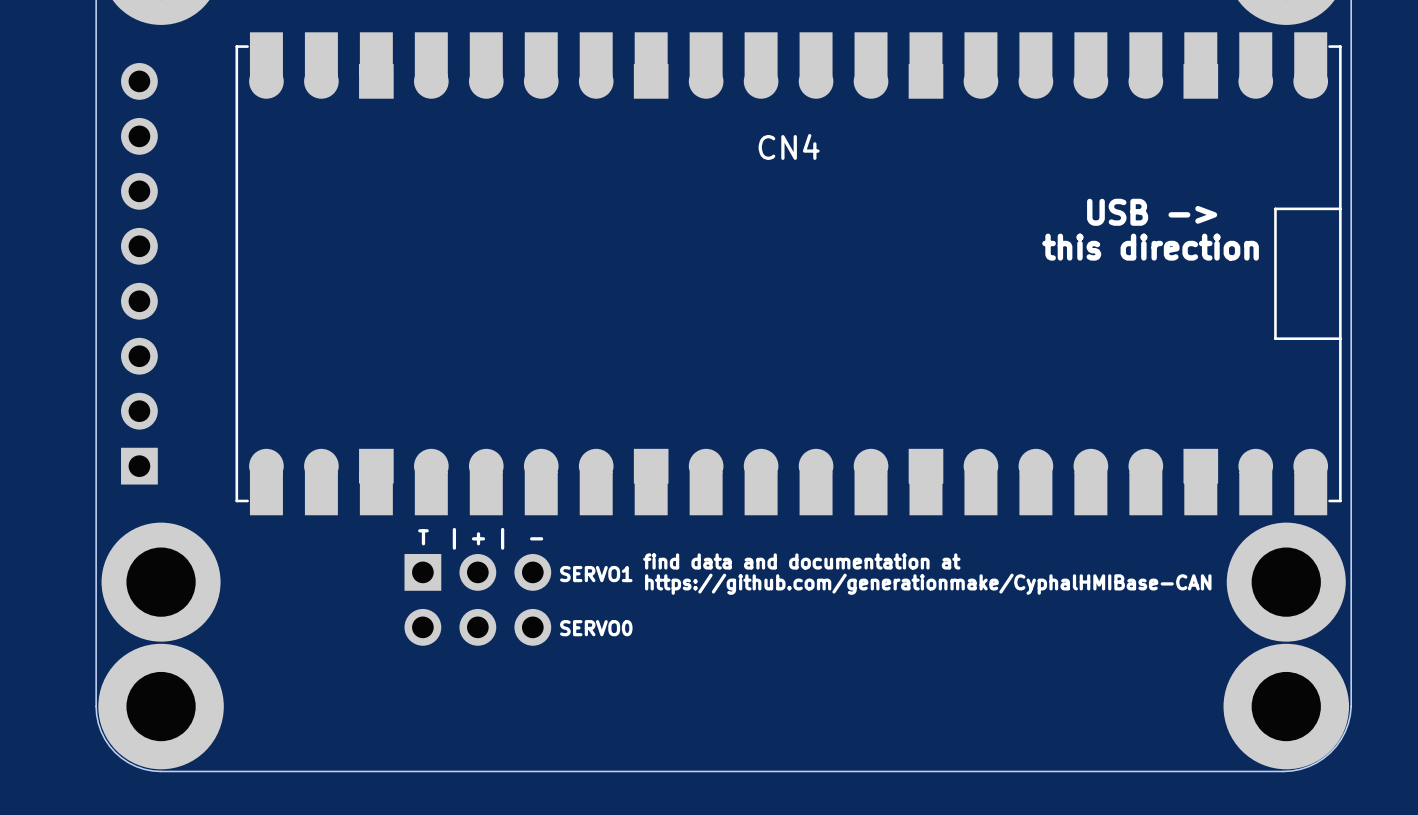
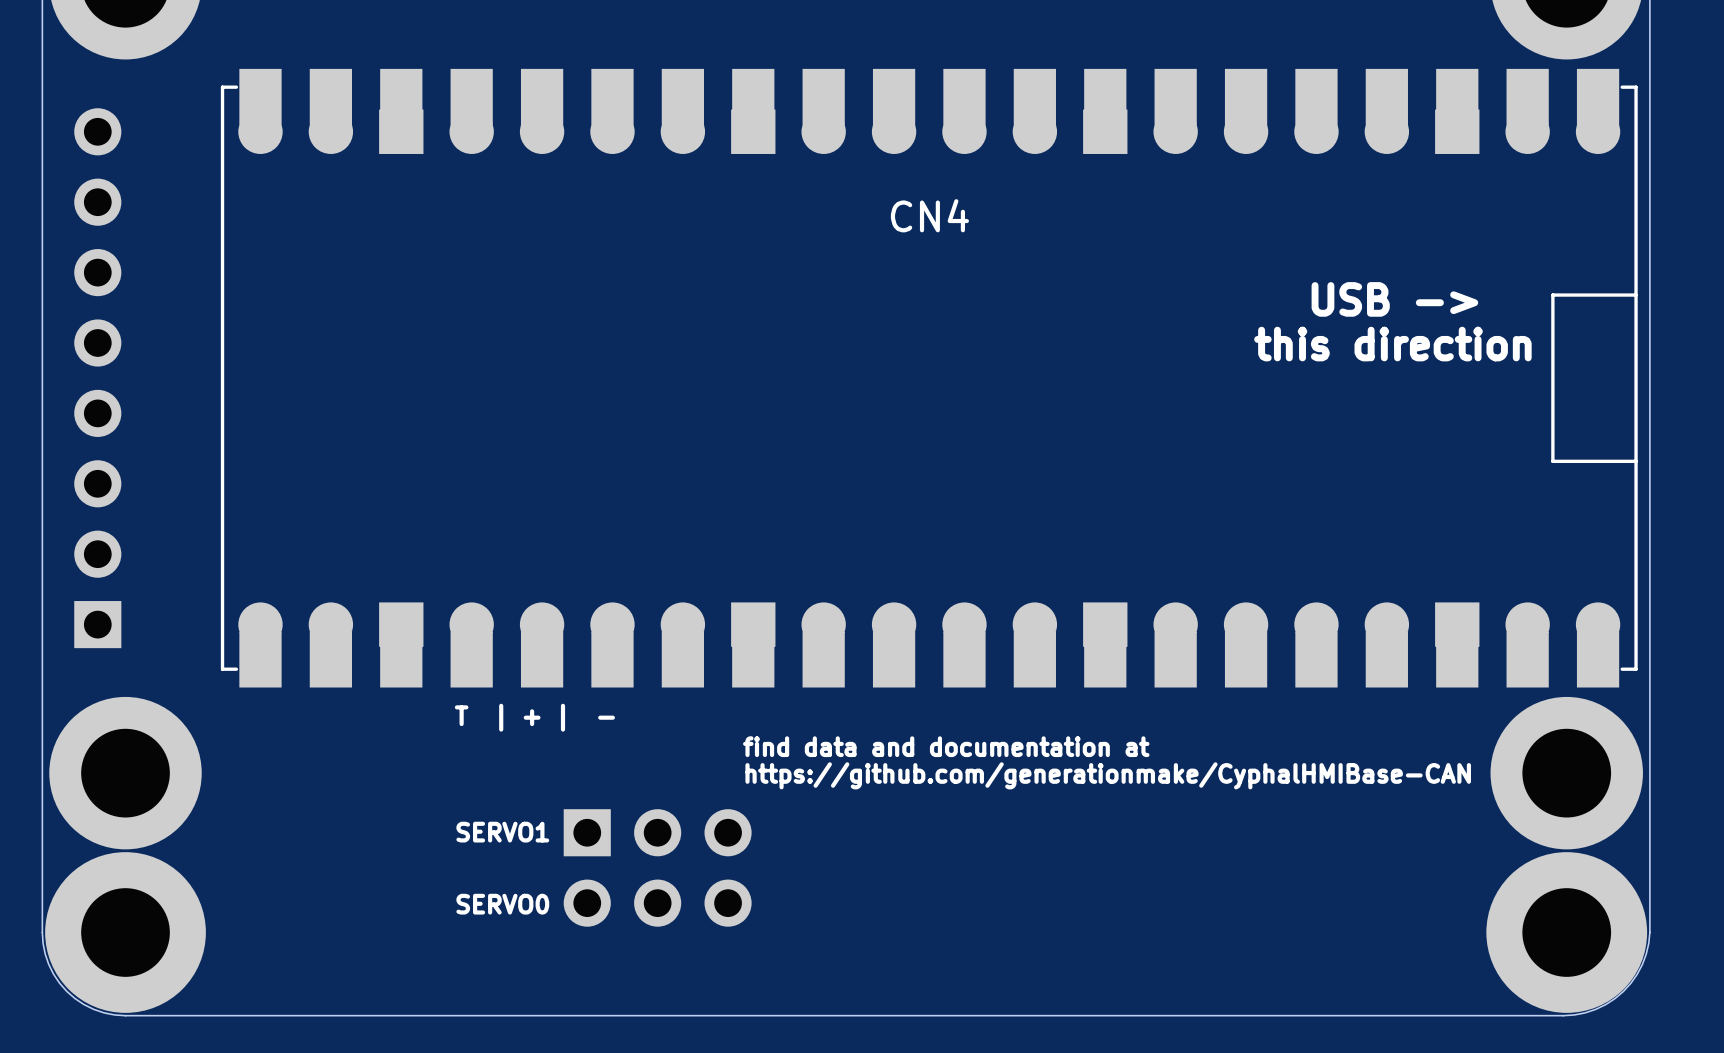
text position: SERVO1 (596, 574) -> SERVO1 (502, 832)
part position: (477, 599) -> (657, 867)
text position: SERVO0 (596, 628) -> SERVO0 (502, 904)

